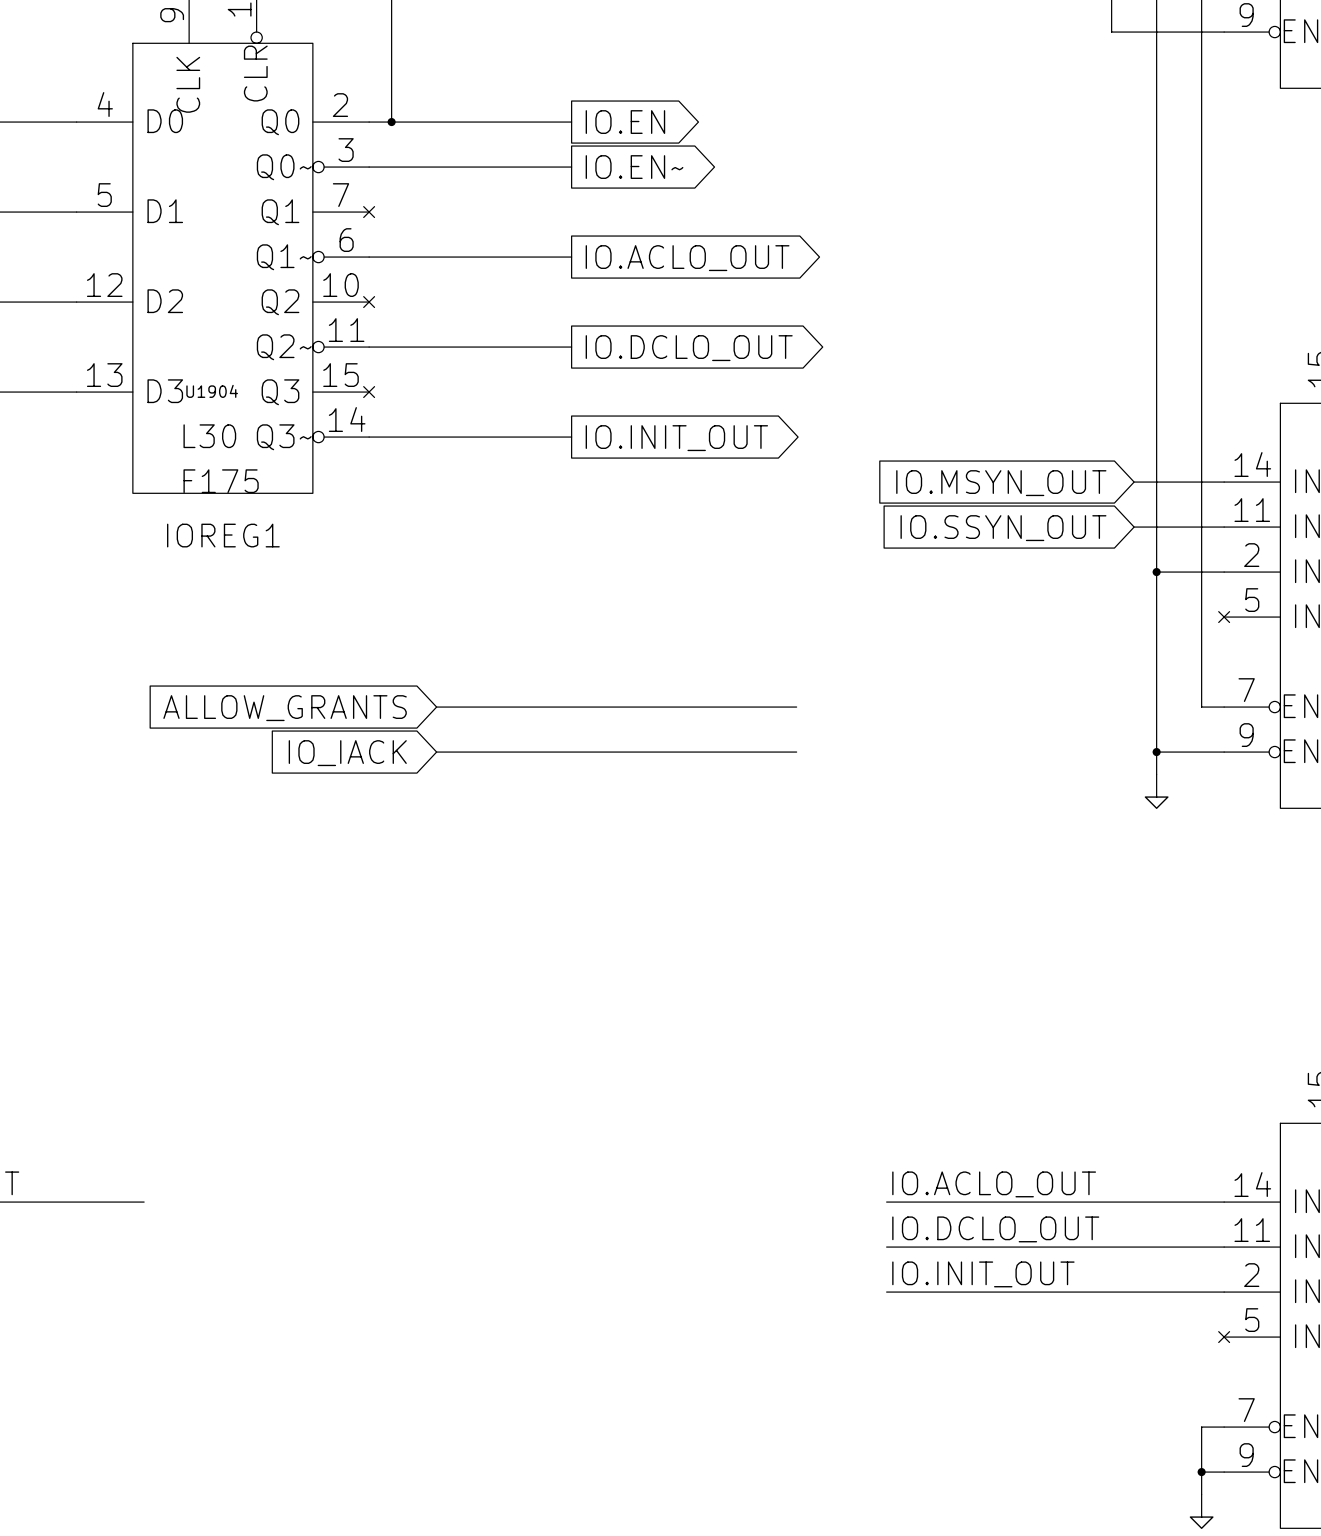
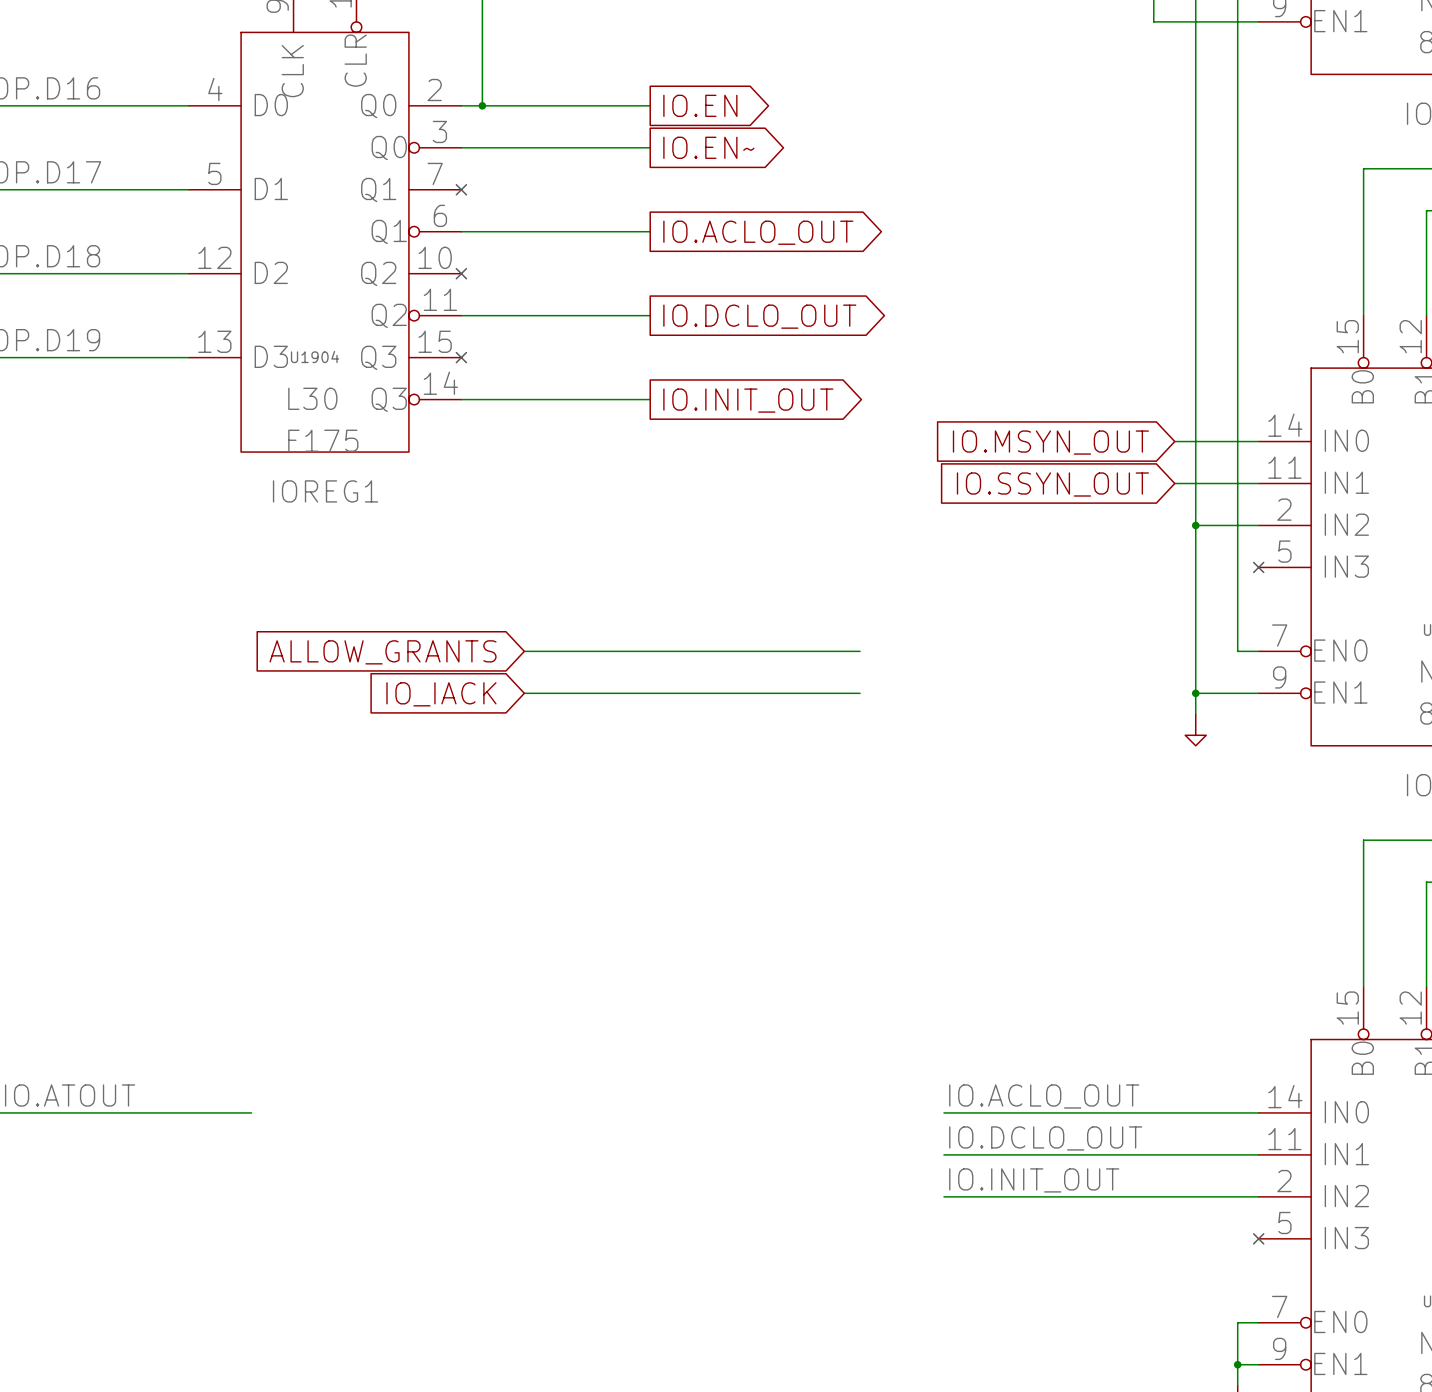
U1904 pin name: Q0~ (284, 167) -> Q0 (389, 148)
U1904 pin name: Q1~ (284, 257) -> Q1 (389, 231)
U1904 pin name: Q2~ (284, 347) -> Q2 (389, 315)
U1904 pin name: Q3~ (284, 437) -> Q3 (389, 399)

